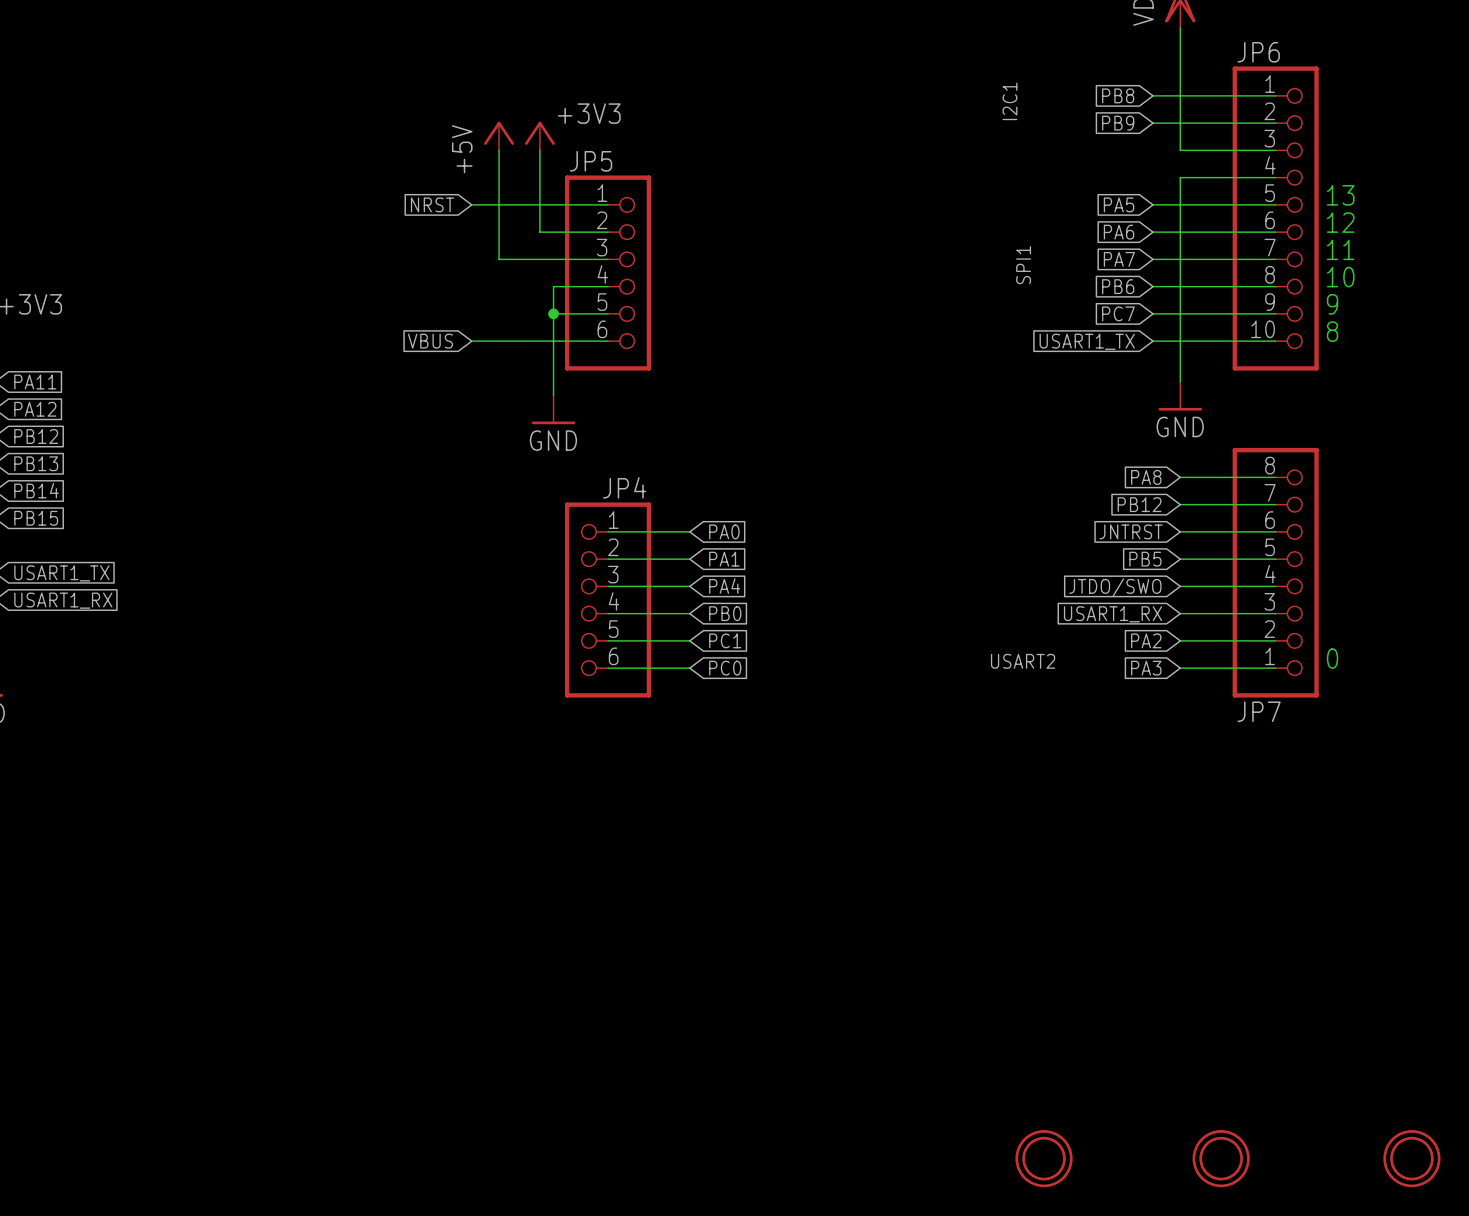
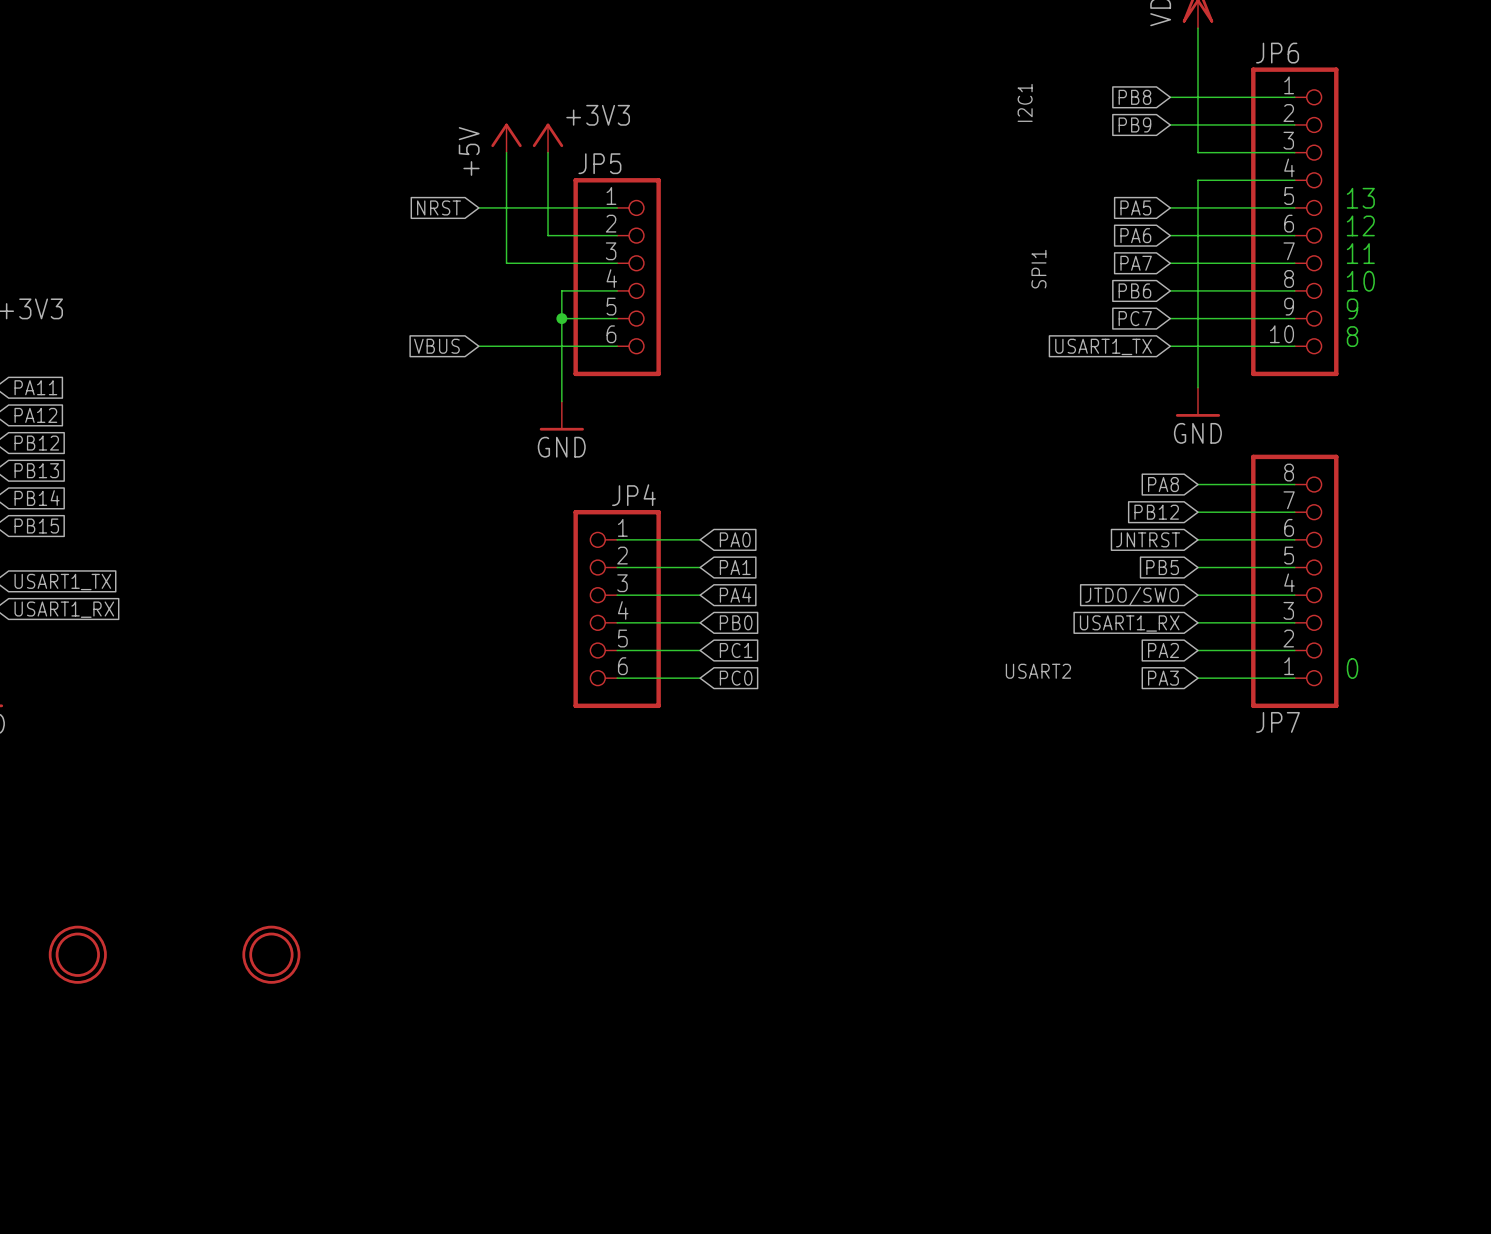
part: none -> (77, 954)
part: none -> (271, 954)
part: (1044, 1158) -> none
part: (1221, 1158) -> none
part: (1411, 1158) -> none

